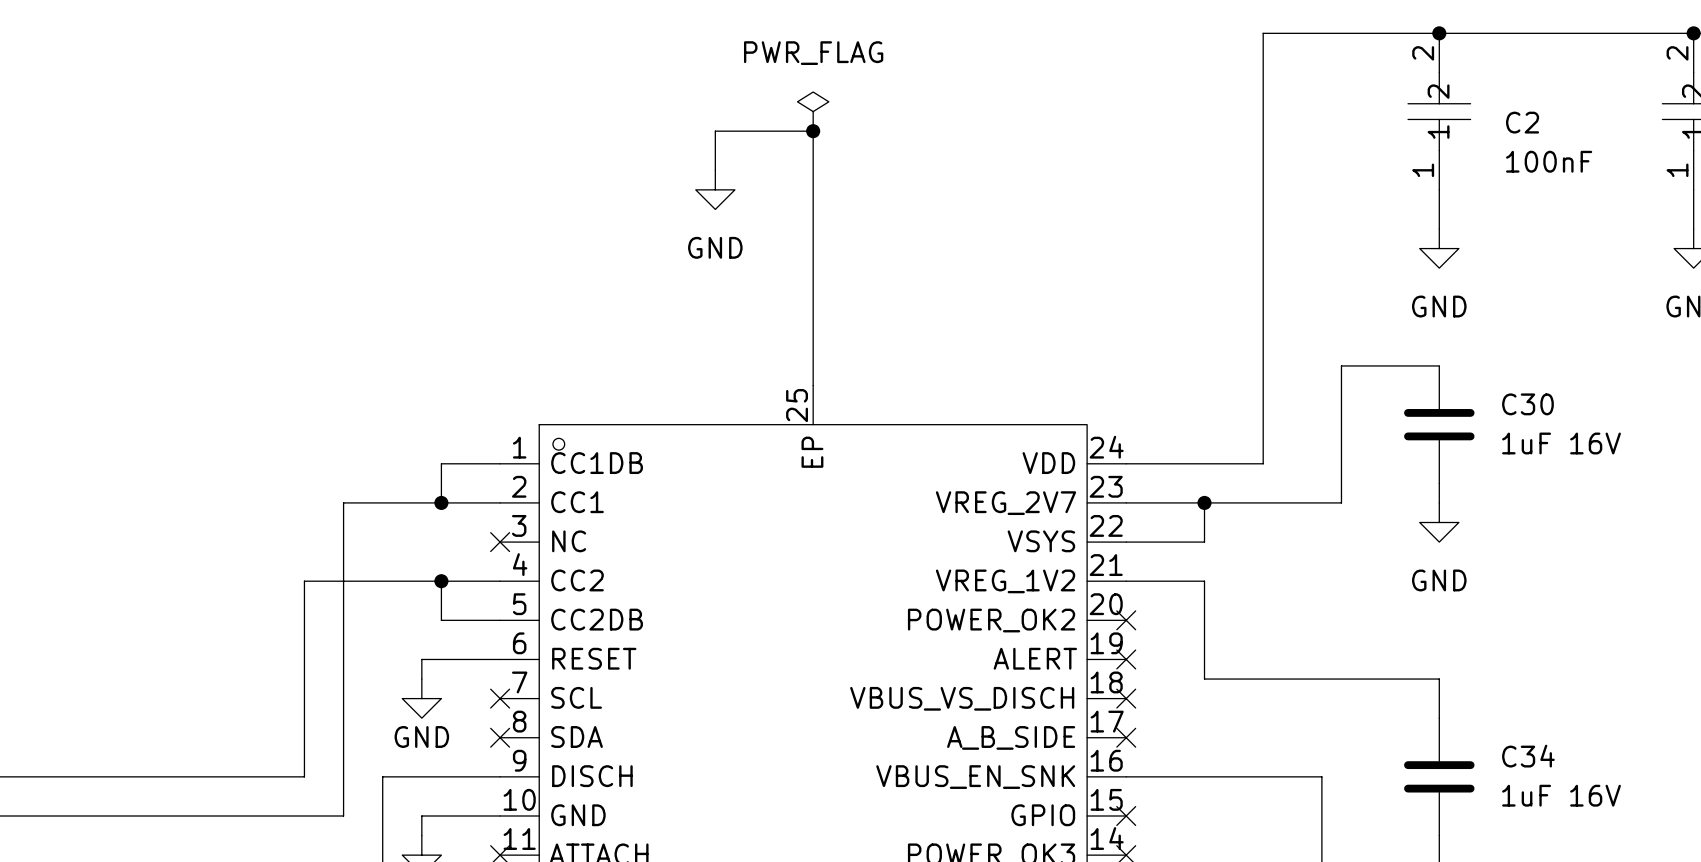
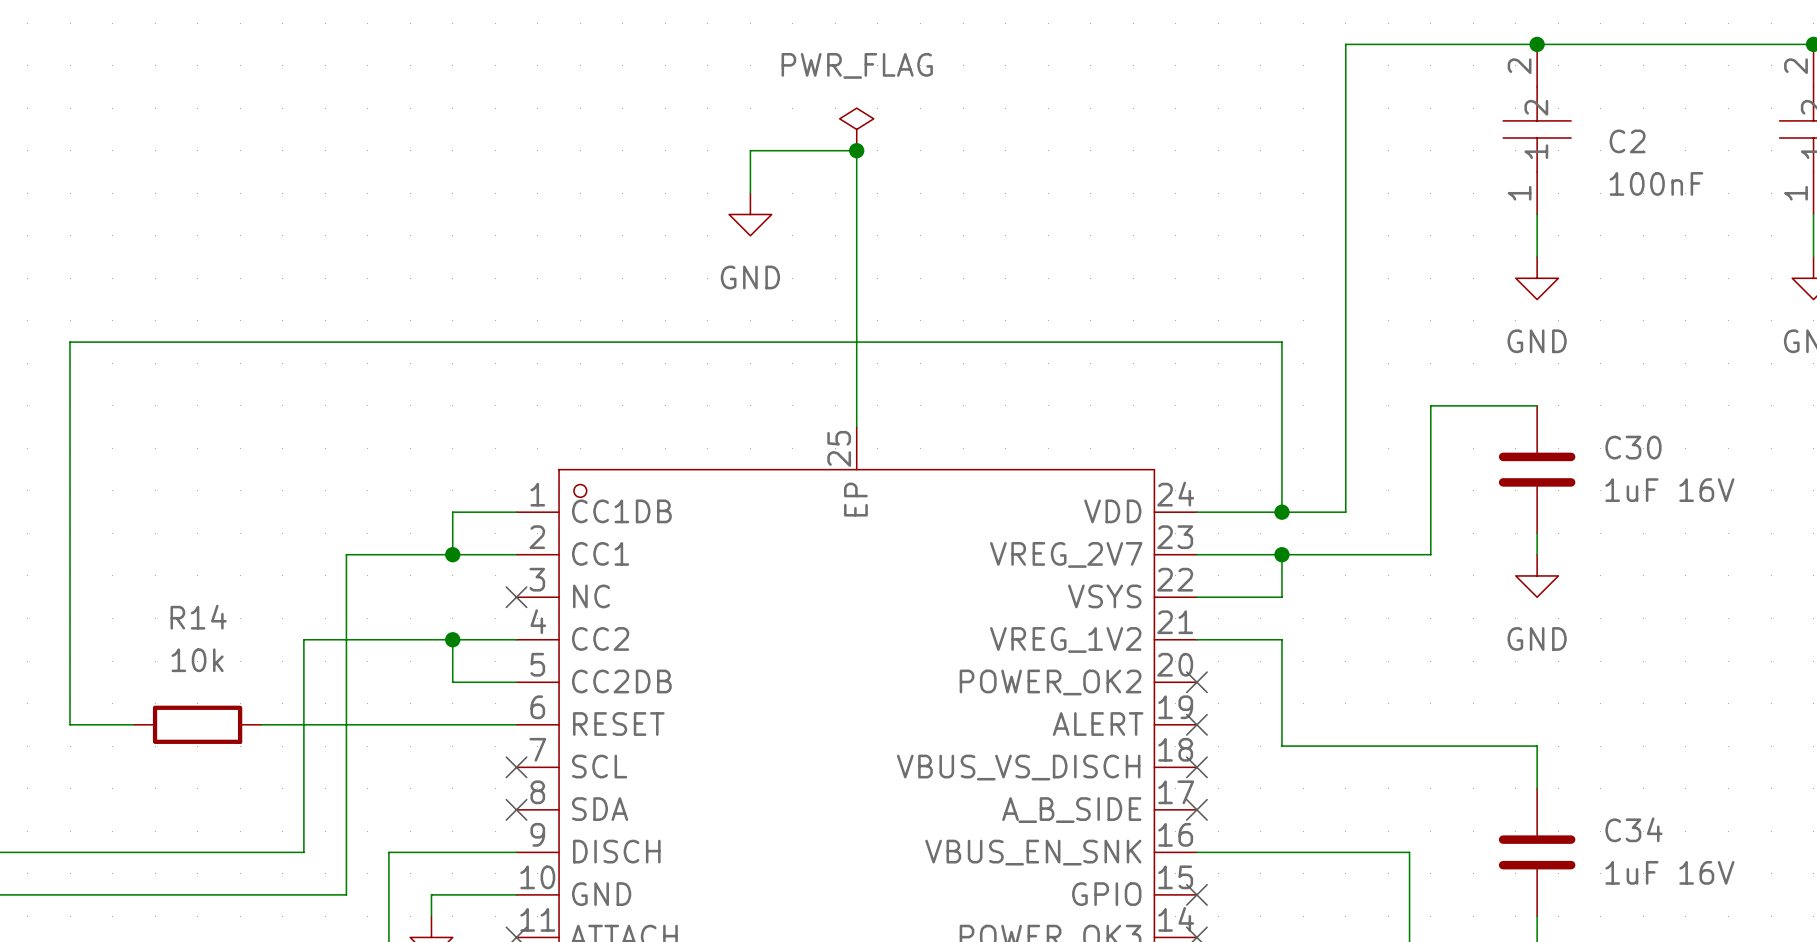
wire: none -> (1281, 512) (1281, 342) (70, 342) (70, 724) (133, 724)
junction: none -> (1281, 512)
R14: none -> 10k (197, 724)
wire: (421, 659) (421, 679) -> (431, 724) (261, 724)
power symbol: GND (421, 698) -> none

